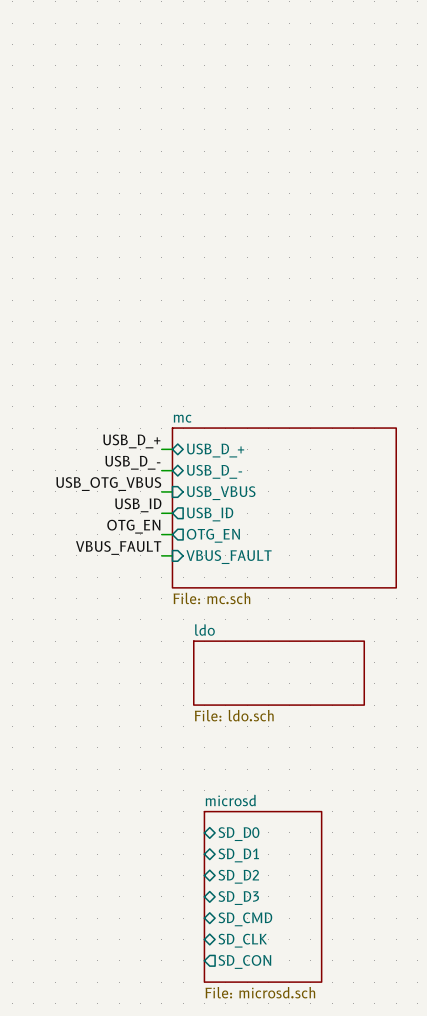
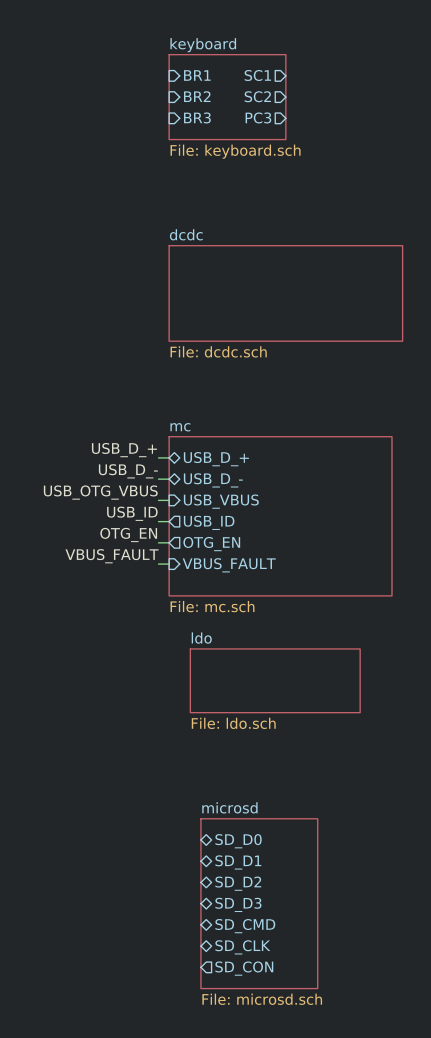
sheet pin: none -> BR1 (197, 75)
sheet pin: none -> SC1 (257, 75)
sheet pin: none -> BR2 (197, 96)
sheet pin: none -> SC2 (257, 96)
sheet keyboard: none -> File: keyboard.sch (227, 97)
sheet pin: none -> BR3 (197, 117)
sheet pin: none -> PC3 (258, 117)
sheet dcdc: none -> File: dcdc.sch (285, 293)

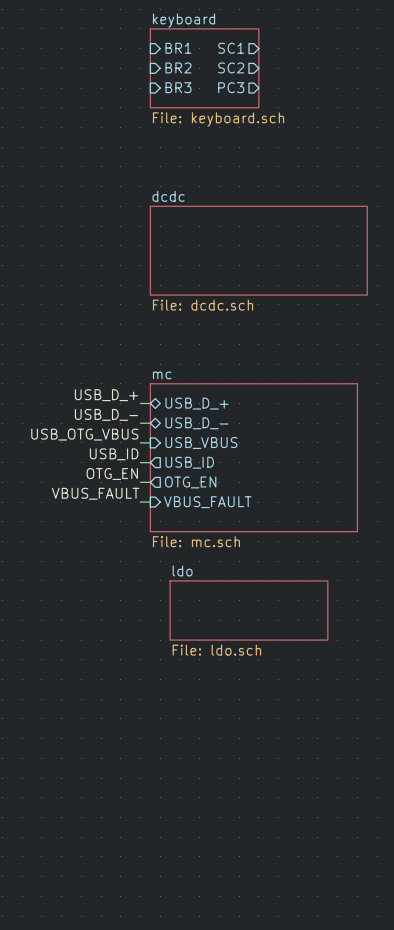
sheet pin: SD_D0 (238, 841) -> none
sheet pin: SD_D1 (238, 862) -> none
sheet pin: SD_D2 (238, 883) -> none
sheet microsd: File: microsd.sch (259, 903) -> none
sheet pin: SD_D3 (238, 904) -> none
sheet pin: SD_CMD (245, 926) -> none
sheet pin: SD_CLK (242, 947) -> none
sheet pin: SD_CON (244, 968) -> none

